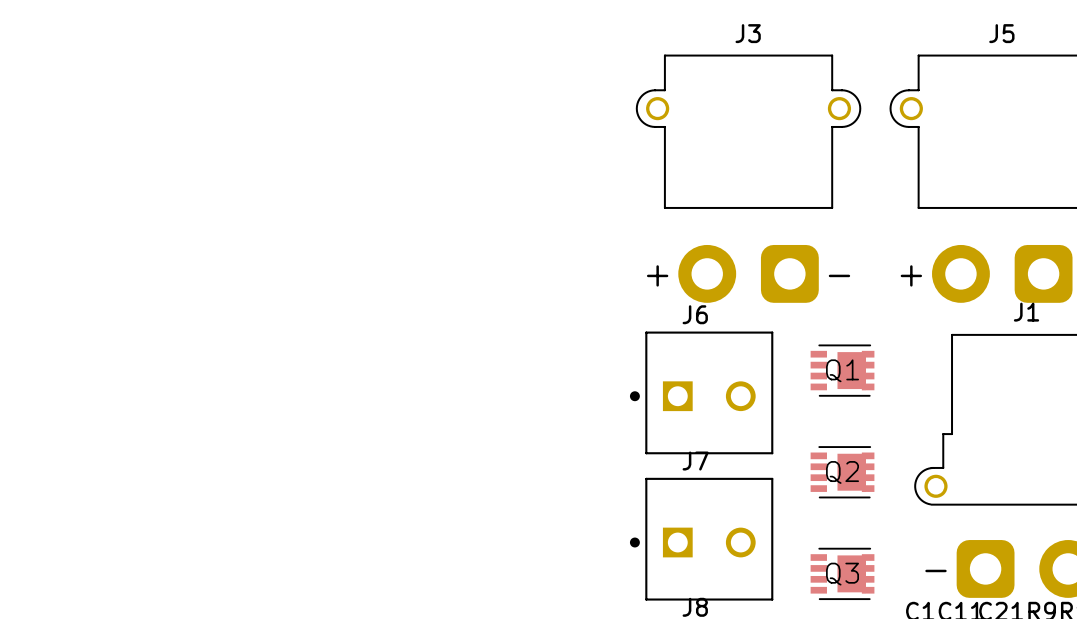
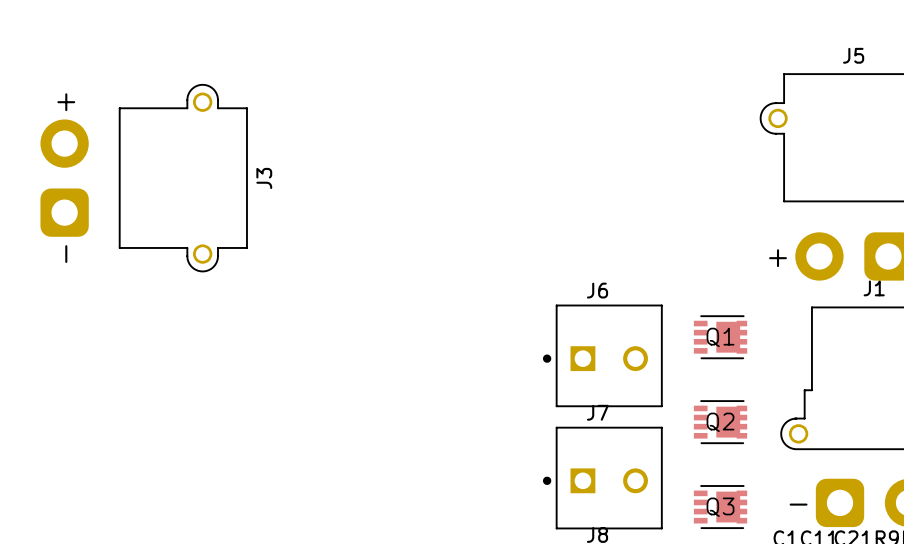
J3 rotation: 0° (748, 178) -> 90° clockwise (144, 178)
J3 position: (748, 178) -> (144, 178)

